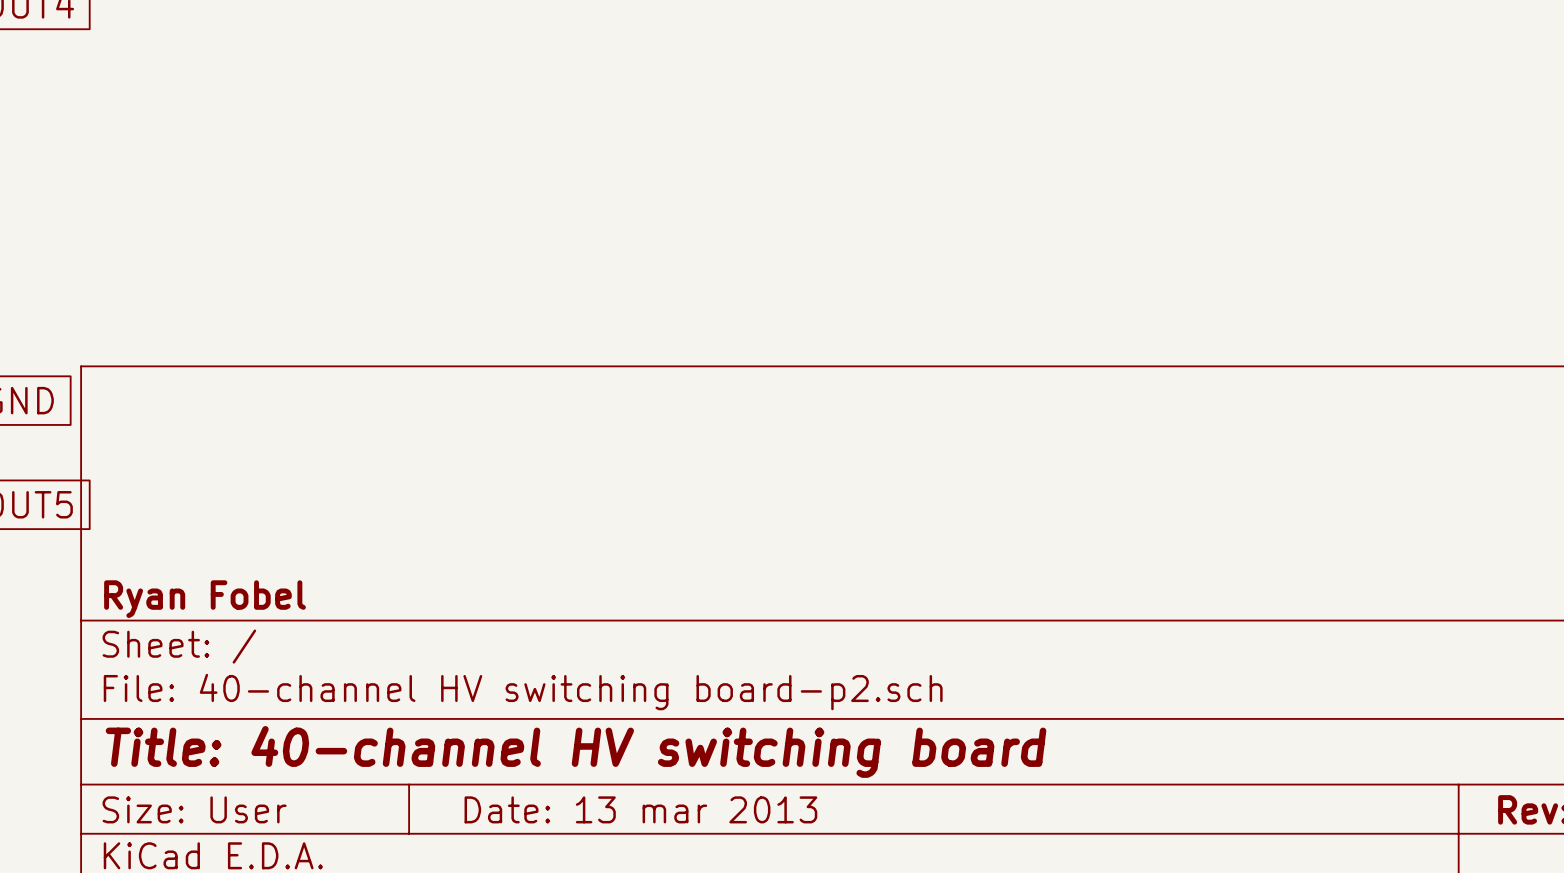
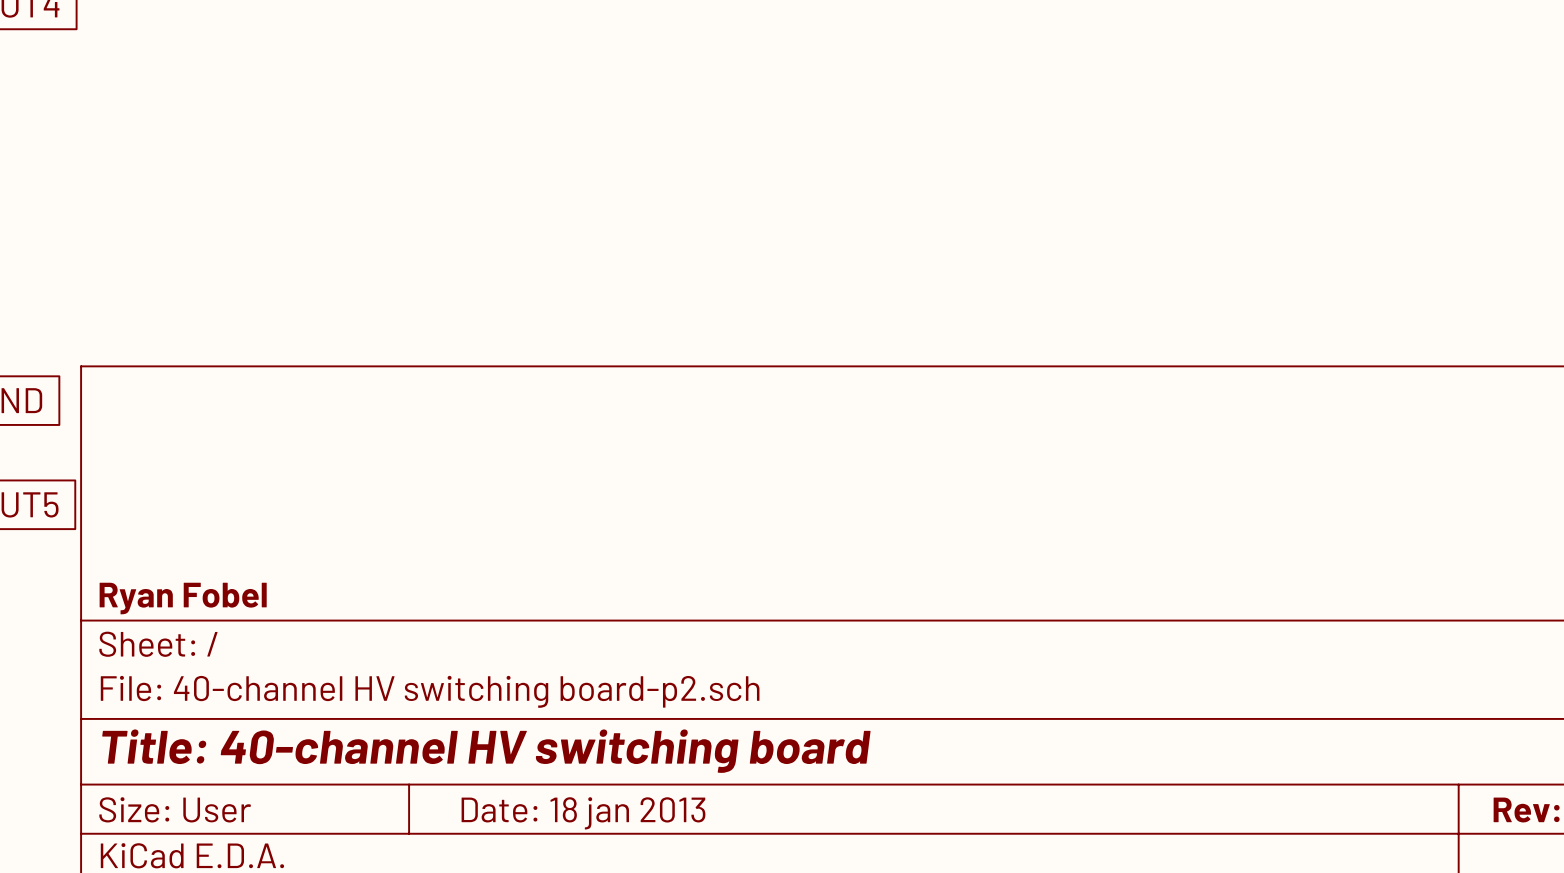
title block: Date: 13 mar 2013 (640, 809) -> Date: 18 jan 2013 (583, 813)

